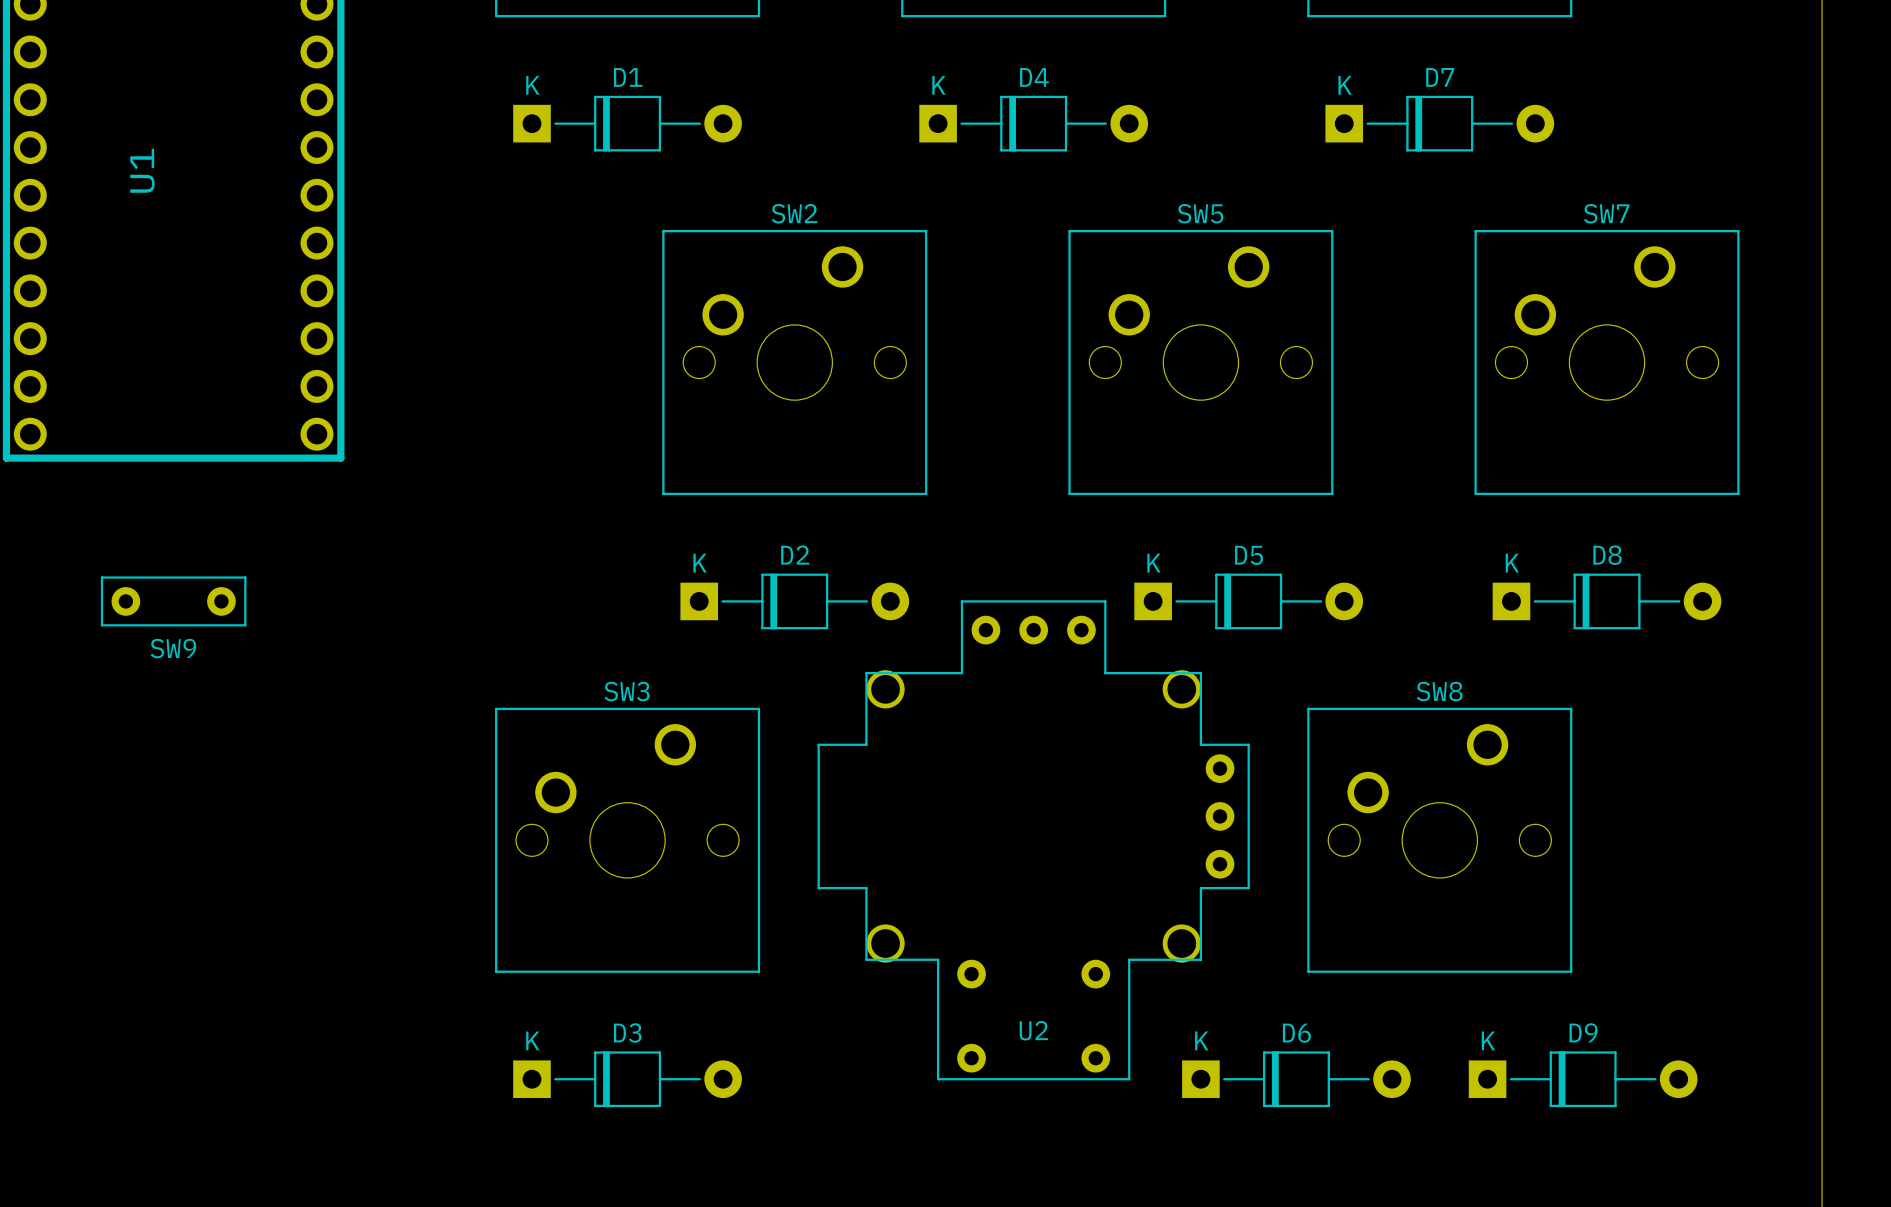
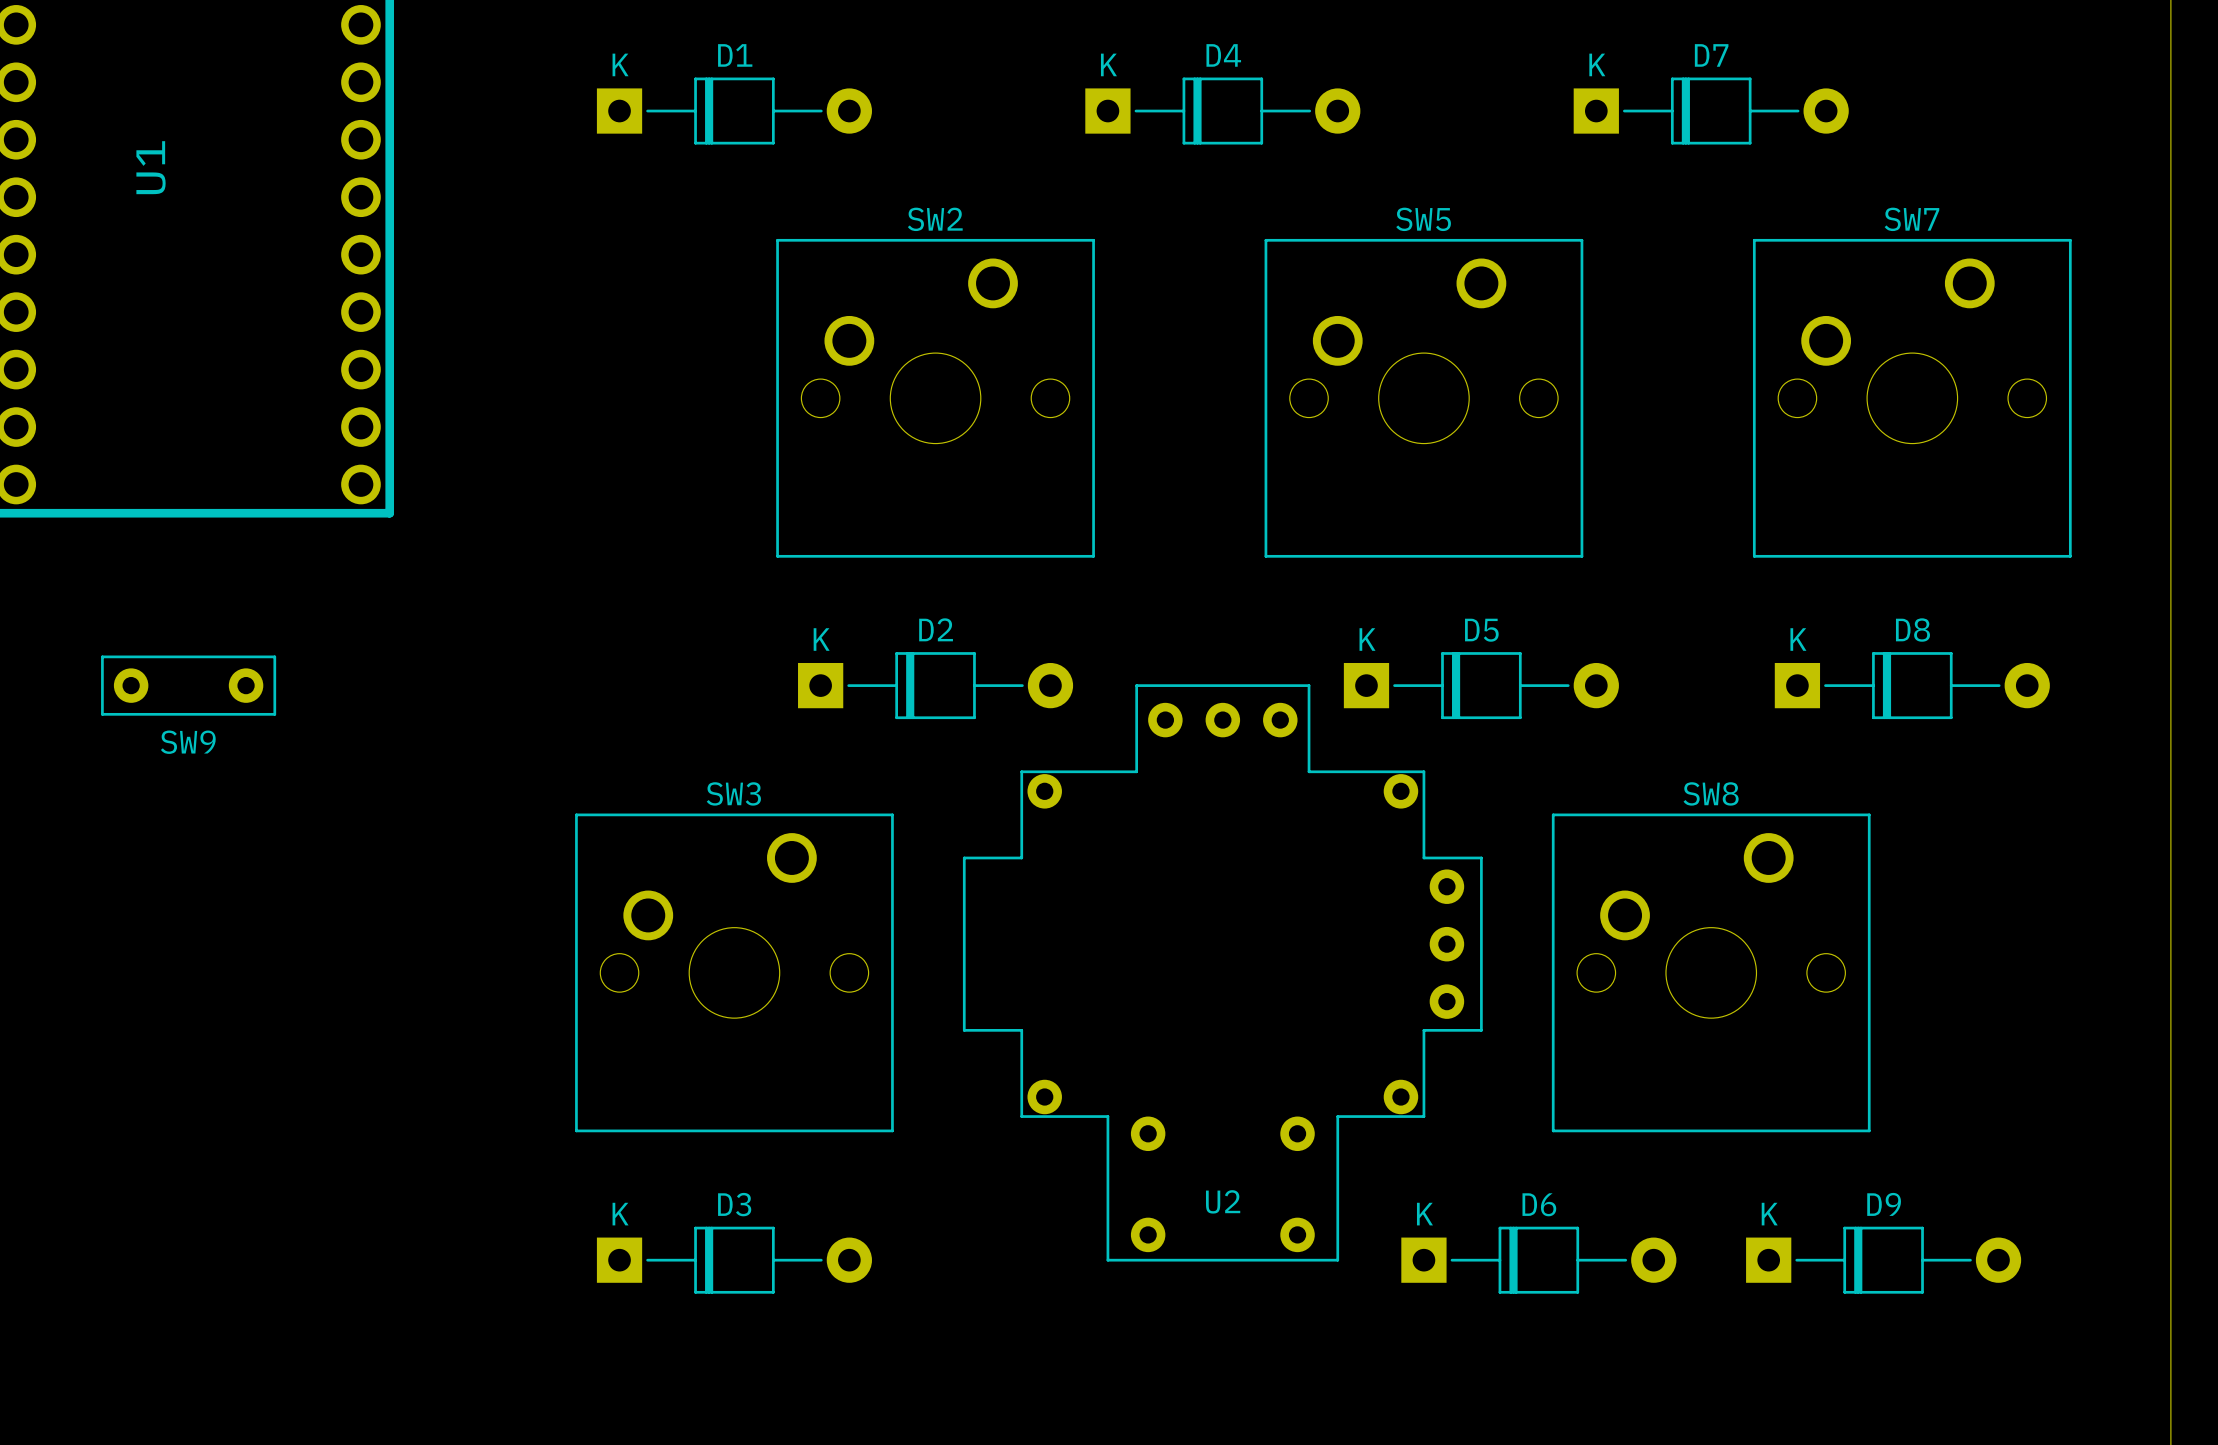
U2 footprint: [817, 600, 1250, 1081] -> [962, 684, 1483, 1262]

